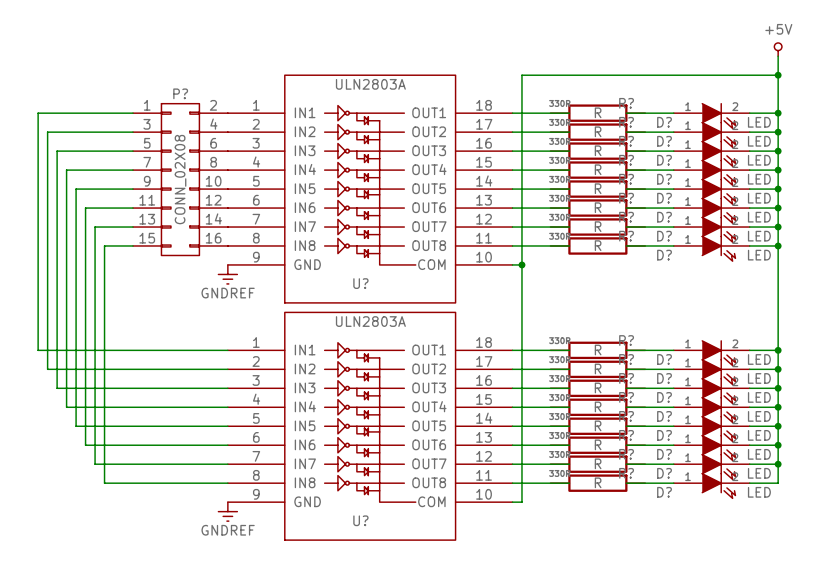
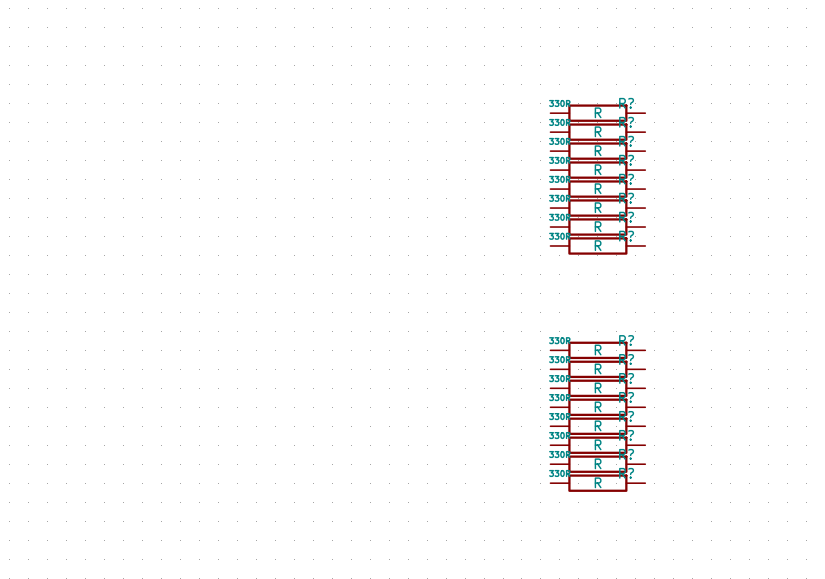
power symbol: +5V (778, 49) -> none
wire: (778, 56) (778, 483) (749, 483) -> none
wire: (778, 75) (521, 75) (521, 502) (512, 502) -> none
junction: (778, 75) -> none
wire: (133, 113) (38, 113) (38, 350) (227, 350) -> none
wire: (512, 113) (569, 113) -> none
wire: (626, 113) (673, 113) -> none
wire: (749, 113) (778, 113) -> none
junction: (778, 113) -> none
D?: LED (711, 116) -> none
wire: (133, 132) (47, 132) (47, 369) (227, 369) -> none
wire: (512, 132) (569, 132) -> none
wire: (626, 132) (673, 132) -> none
wire: (749, 132) (778, 132) -> none
junction: (778, 132) -> none
D?: LED (711, 134) -> none
wire: (133, 151) (57, 151) (57, 388) (227, 388) -> none
wire: (512, 151) (569, 151) -> none
wire: (626, 151) (673, 151) -> none
wire: (749, 151) (778, 151) -> none
junction: (778, 151) -> none
D?: LED (711, 153) -> none
wire: (133, 170) (66, 170) (66, 407) (227, 407) -> none
wire: (512, 170) (569, 170) -> none
wire: (626, 170) (673, 170) -> none
wire: (749, 170) (778, 170) -> none
junction: (778, 170) -> none
D?: LED (711, 172) -> none
P?: CONN_02X08 (180, 179) -> none
wire: (133, 189) (76, 189) (76, 426) (227, 426) -> none
U?: ULN2803A (370, 189) -> none
wire: (512, 189) (569, 189) -> none
wire: (626, 189) (673, 189) -> none
wire: (749, 189) (778, 189) -> none
junction: (778, 189) -> none
D?: LED (711, 191) -> none
wire: (133, 208) (85, 208) (85, 445) (227, 445) -> none
wire: (512, 208) (569, 208) -> none
wire: (626, 208) (673, 208) -> none
wire: (749, 208) (778, 208) -> none
junction: (778, 208) -> none
D?: LED (711, 210) -> none
wire: (133, 227) (95, 227) (95, 464) (227, 464) -> none
wire: (512, 227) (569, 227) -> none
wire: (626, 227) (673, 227) -> none
wire: (749, 227) (778, 227) -> none
junction: (778, 227) -> none
D?: LED (711, 229) -> none
wire: (133, 245) (104, 245) (104, 483) (227, 483) -> none
wire: (512, 245) (569, 245) -> none
wire: (626, 245) (673, 245) -> none
wire: (749, 245) (778, 245) -> none
junction: (778, 245) -> none
D?: LED (711, 248) -> none
wire: (512, 264) (521, 264) -> none
junction: (521, 264) -> none
power symbol: GNDREF (227, 274) -> none
wire: (512, 350) (569, 350) -> none
wire: (626, 350) (673, 350) -> none
wire: (749, 350) (778, 350) -> none
junction: (778, 350) -> none
D?: LED (711, 353) -> none
wire: (512, 369) (569, 369) -> none
wire: (626, 369) (673, 369) -> none
wire: (749, 369) (778, 369) -> none
junction: (778, 369) -> none
D?: LED (711, 372) -> none
wire: (512, 388) (569, 388) -> none
wire: (626, 388) (673, 388) -> none
wire: (749, 388) (778, 388) -> none
junction: (778, 388) -> none
D?: LED (711, 391) -> none
wire: (512, 407) (569, 407) -> none
wire: (626, 407) (673, 407) -> none
wire: (749, 407) (778, 407) -> none
junction: (778, 407) -> none
D?: LED (711, 410) -> none
U?: ULN2803A (370, 426) -> none
wire: (512, 426) (569, 426) -> none
wire: (626, 426) (673, 426) -> none
wire: (749, 426) (778, 426) -> none
junction: (778, 426) -> none
D?: LED (711, 429) -> none
wire: (512, 445) (569, 445) -> none
wire: (626, 445) (673, 445) -> none
wire: (749, 445) (778, 445) -> none
junction: (778, 445) -> none
D?: LED (711, 448) -> none
wire: (512, 464) (569, 464) -> none
wire: (626, 464) (673, 464) -> none
wire: (749, 464) (778, 464) -> none
junction: (778, 464) -> none
D?: LED (711, 467) -> none
wire: (512, 483) (569, 483) -> none
wire: (626, 483) (673, 483) -> none
D?: LED (711, 486) -> none
power symbol: GNDREF (227, 511) -> none

